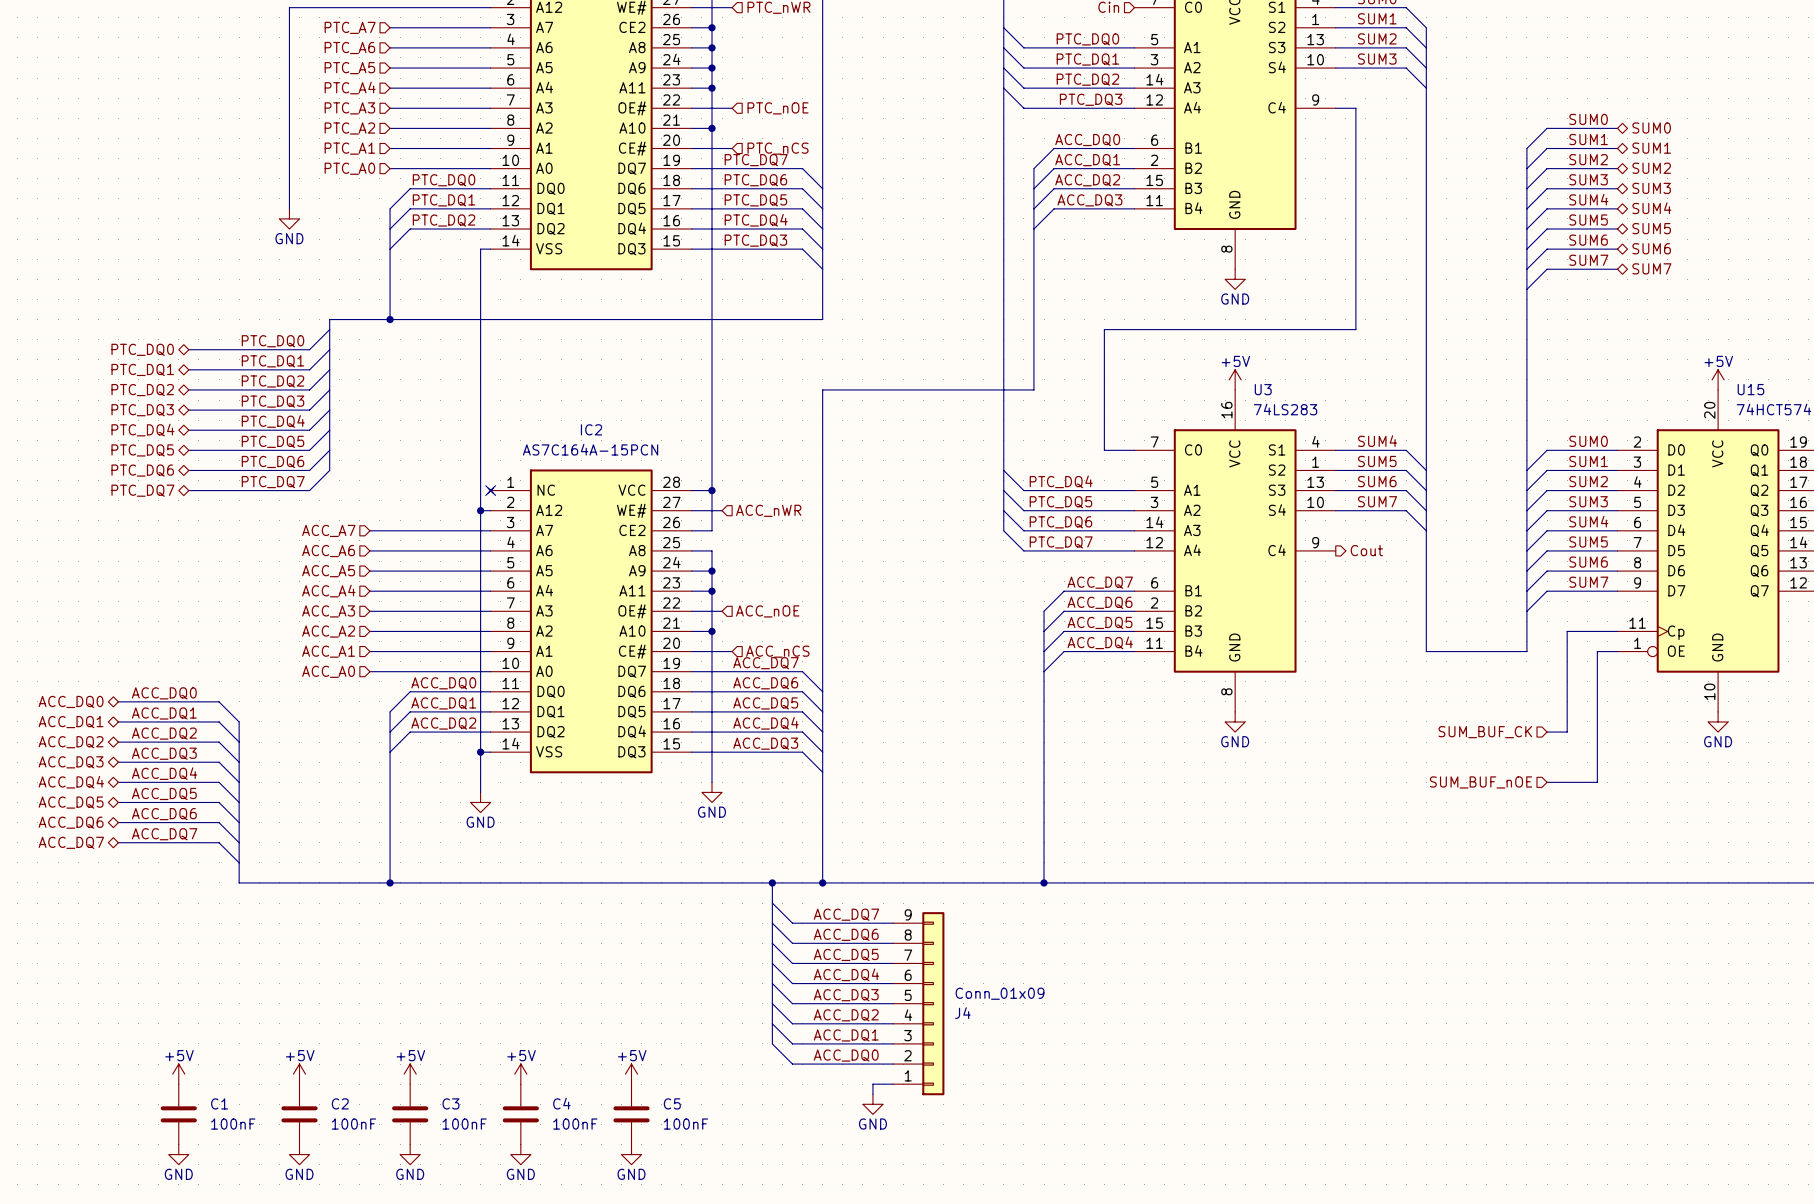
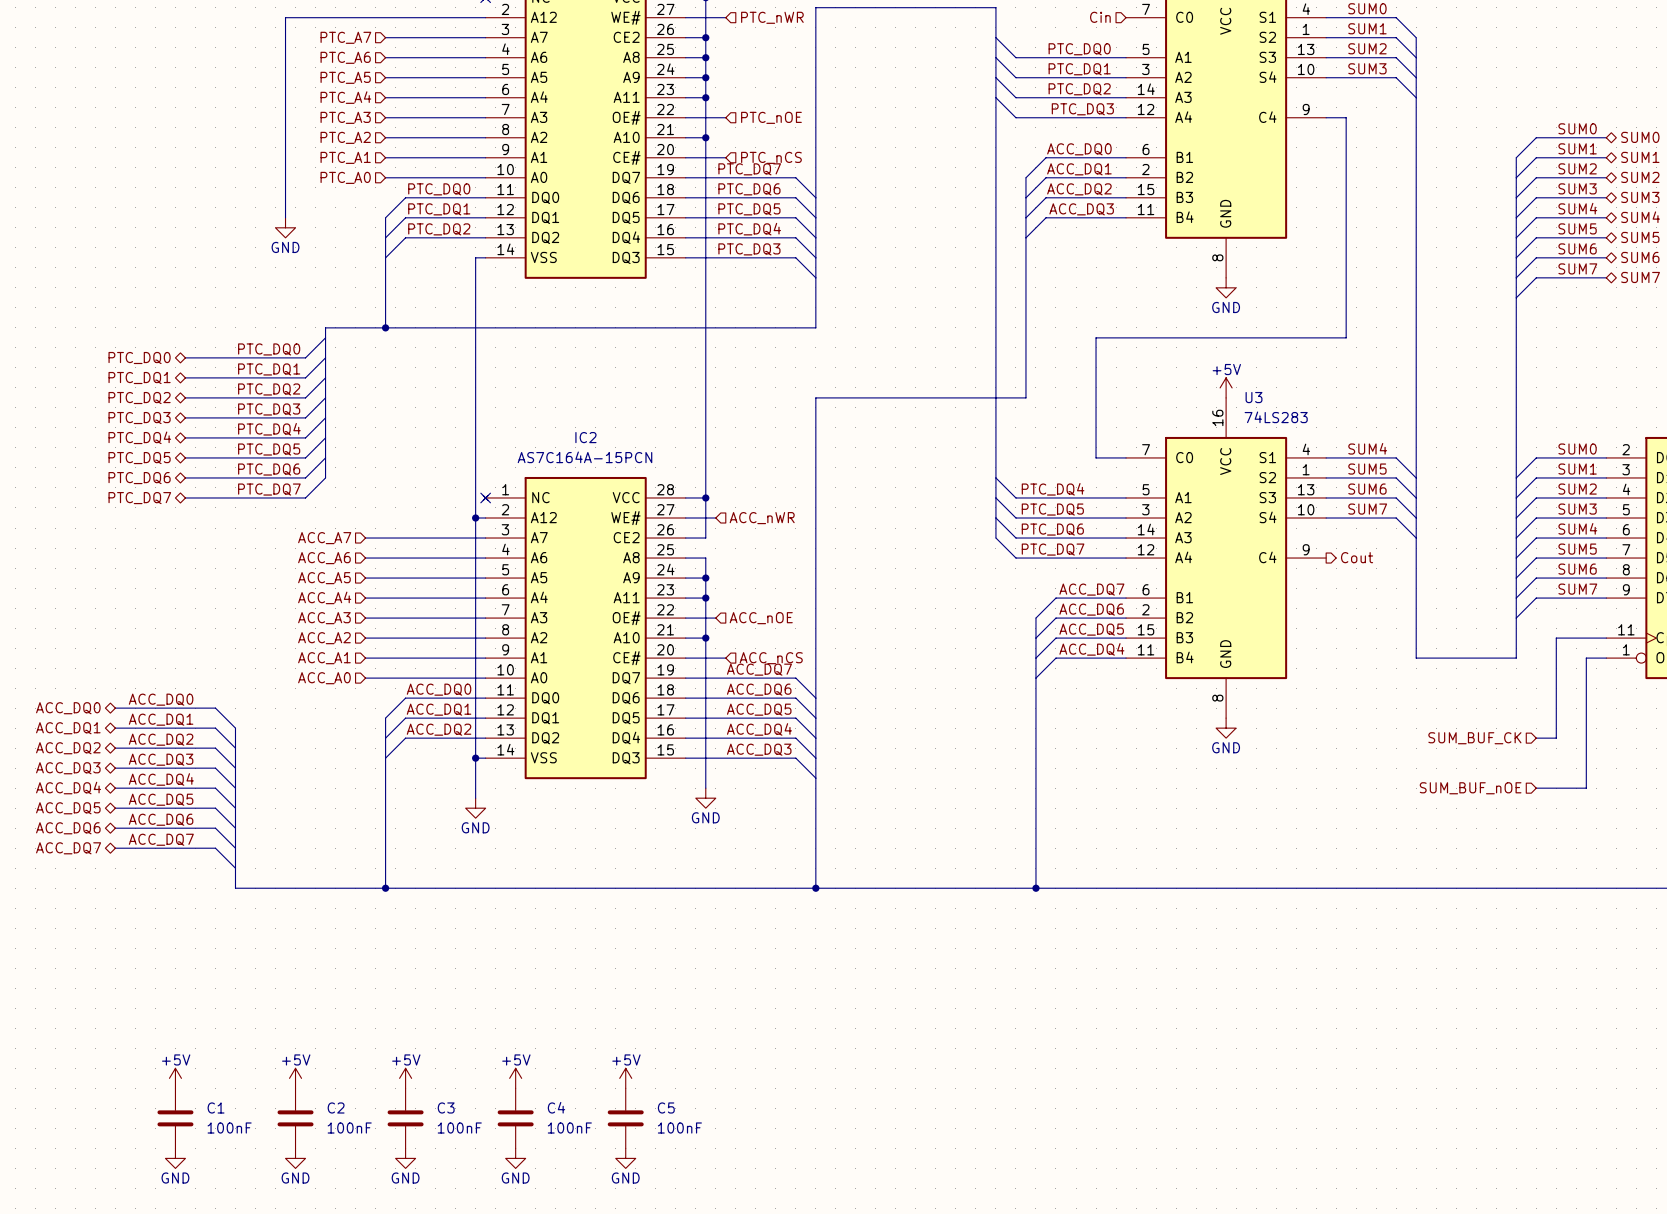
bus: (772, 882) (772, 1043) -> none
junction: (772, 882) -> none
wire: (772, 903) (792, 923) (893, 923) -> none
label: ACC_DQ7 (846, 914) -> none
wire: (772, 923) (792, 943) (893, 943) -> none
label: ACC_DQ6 (846, 934) -> none
wire: (772, 943) (792, 963) (893, 963) -> none
label: ACC_DQ5 (846, 954) -> none
wire: (772, 963) (792, 983) (893, 983) -> none
label: ACC_DQ4 (846, 974) -> none
wire: (772, 983) (792, 1003) (893, 1003) -> none
label: ACC_DQ3 (846, 995) -> none
wire: (772, 1003) (792, 1023) (893, 1023) -> none
J4: Conn_01x09 (918, 1003) -> none
label: ACC_DQ2 (846, 1015) -> none
wire: (772, 1023) (792, 1043) (893, 1043) -> none
label: ACC_DQ1 (846, 1035) -> none
wire: (772, 1043) (792, 1064) (893, 1064) -> none
label: ACC_DQ0 (846, 1055) -> none
wire: (893, 1084) (872, 1084) (872, 1094) -> none
power symbol: GND (872, 1104) -> none

